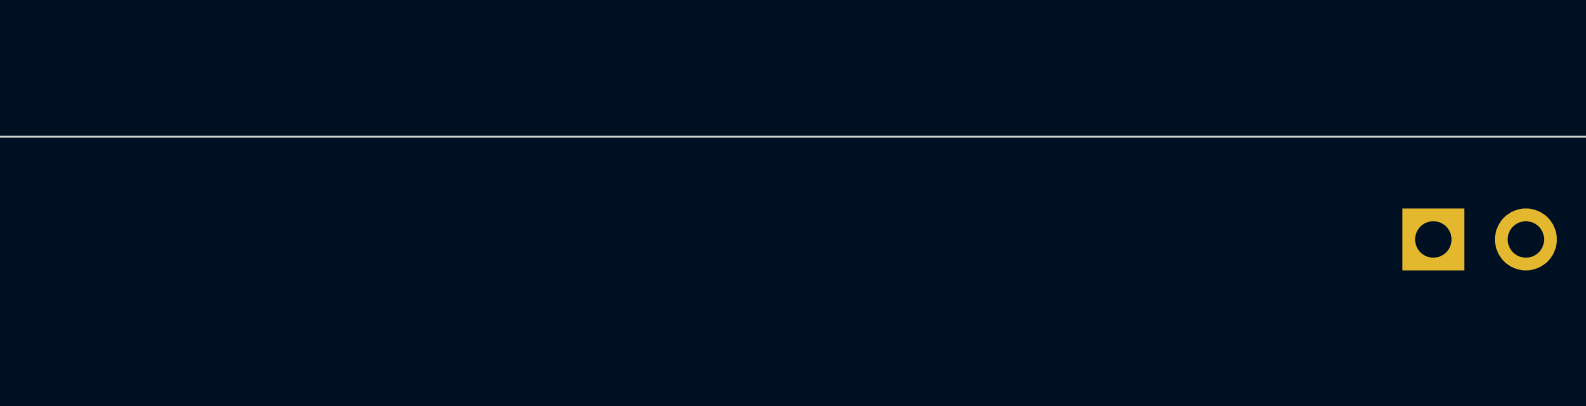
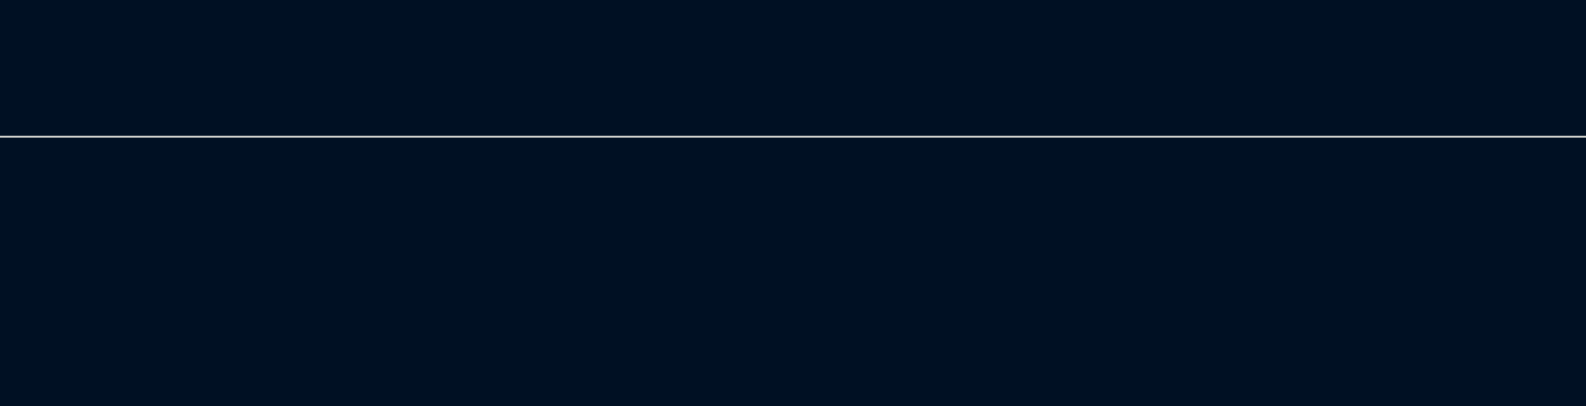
part: (1479, 239) -> none

